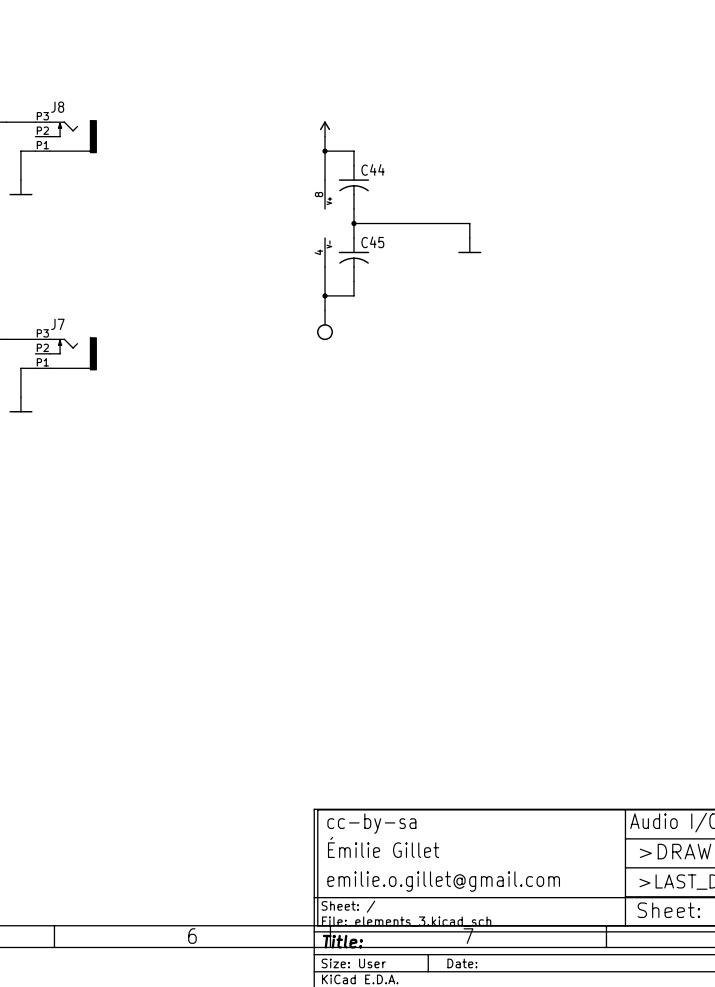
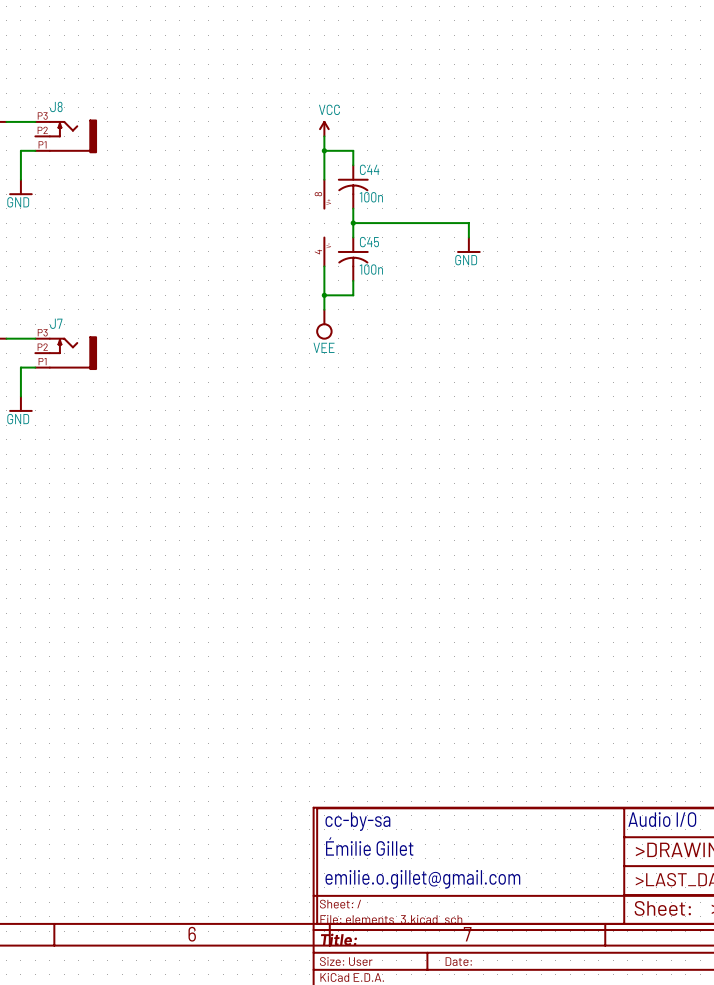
power symbol text: none -> VCC (329, 109)
C44 value: none -> 100n (371, 197)
power symbol text: none -> GND (18, 202)
power symbol text: none -> GND (466, 260)
C45 value: none -> 100n (371, 269)
power symbol text: none -> VEE (324, 347)
power symbol text: none -> GND (18, 419)

